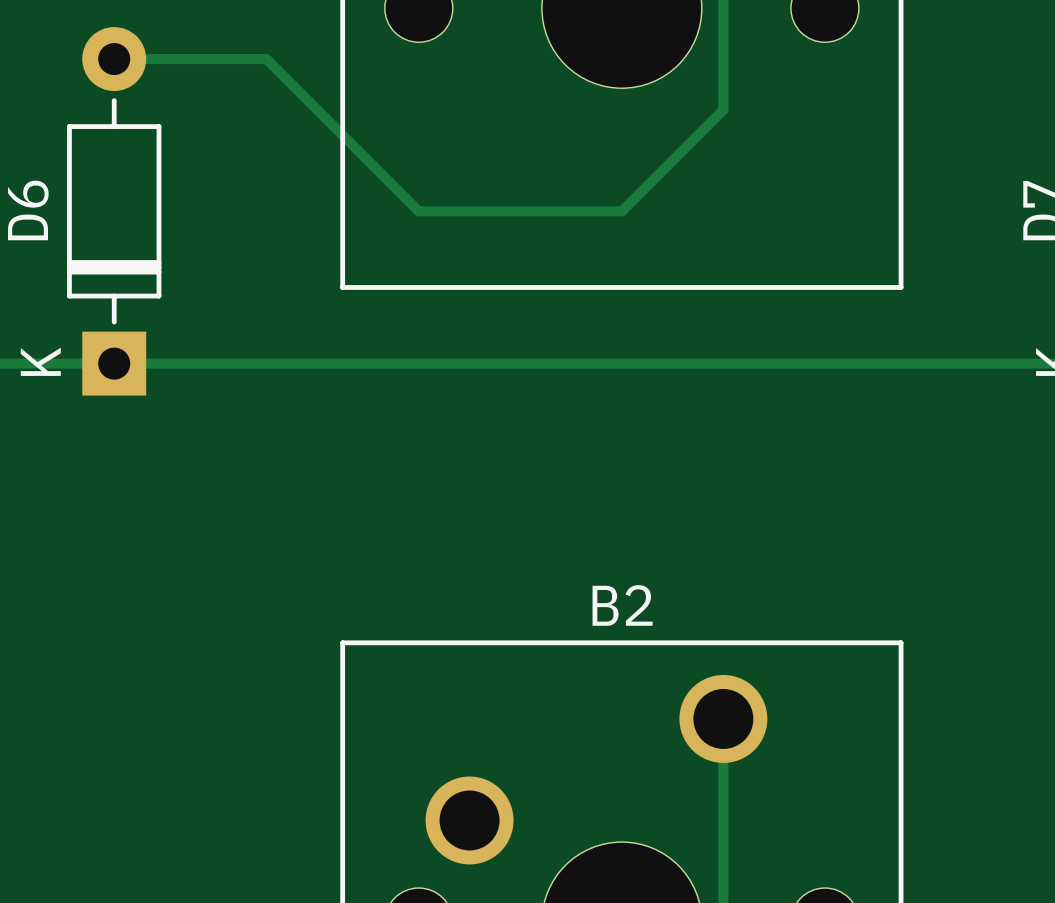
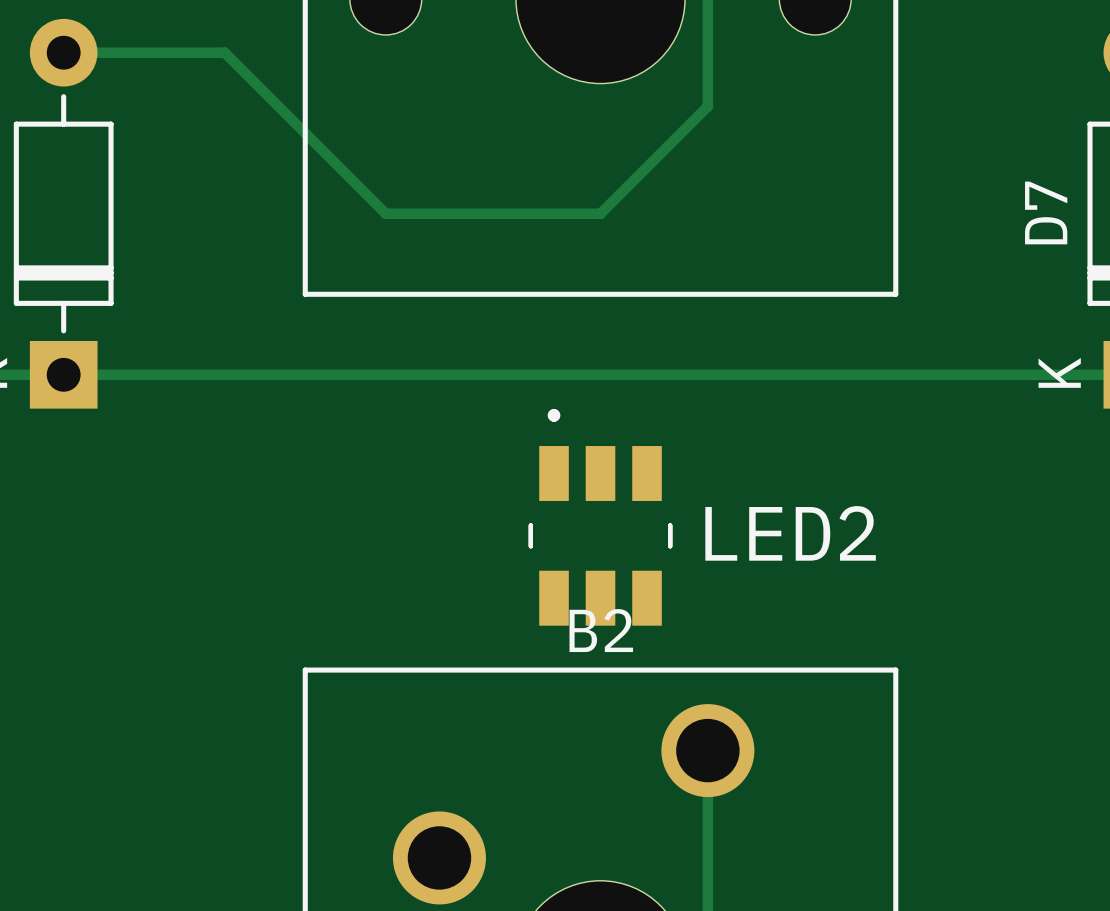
LED2: none -> (600, 517)

